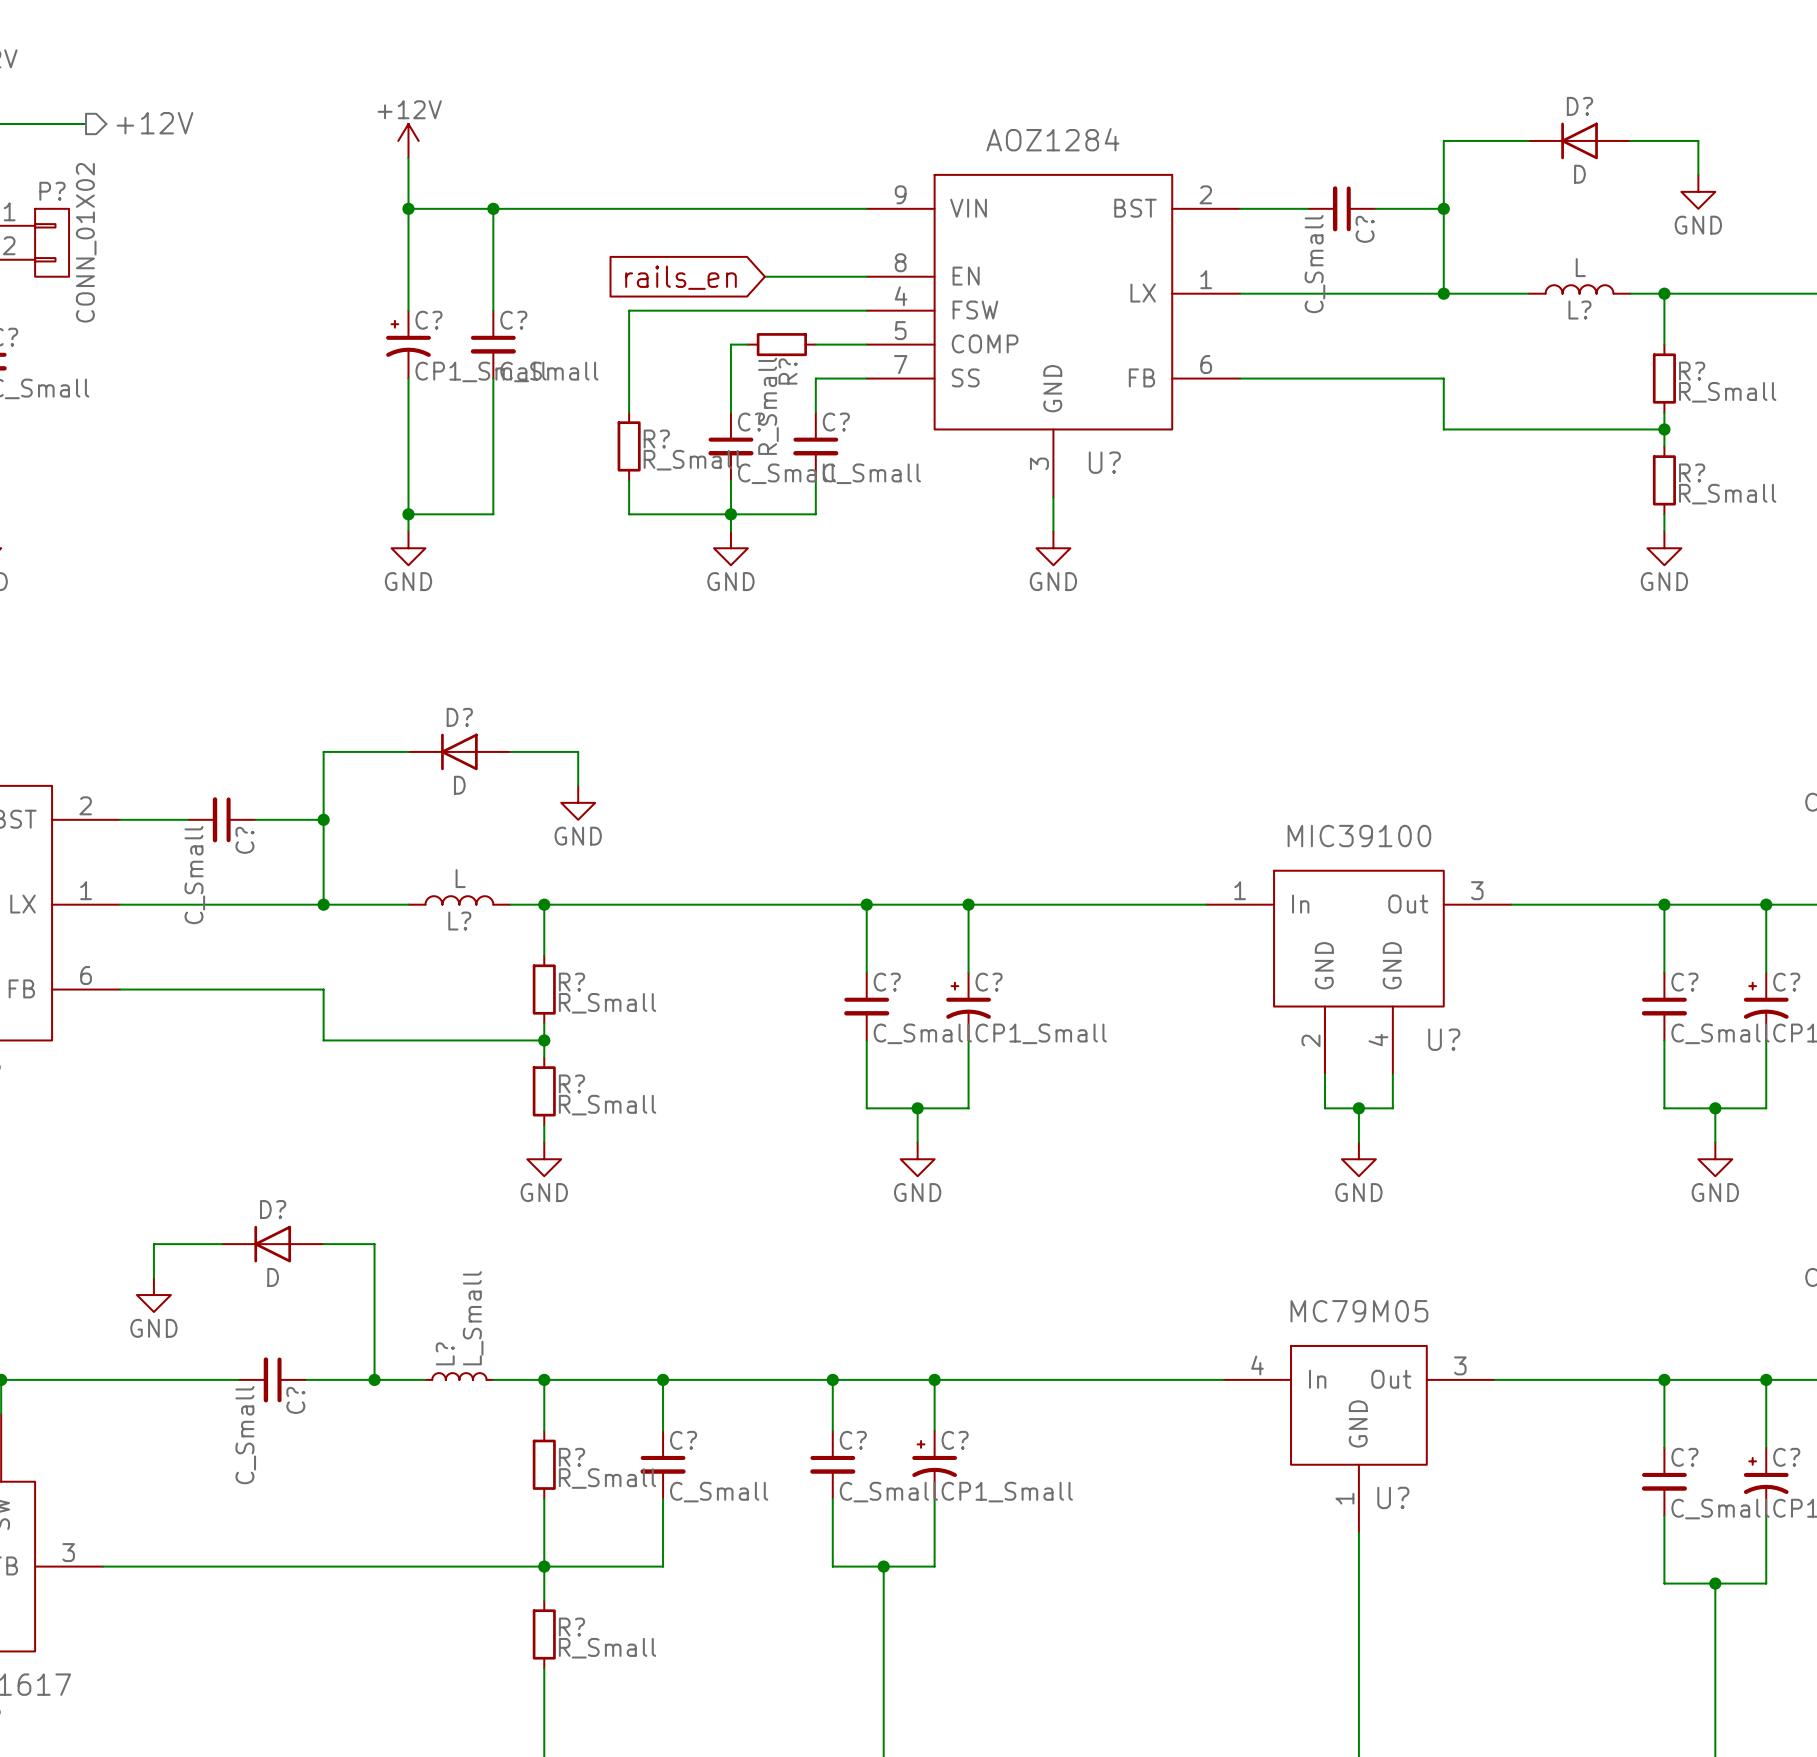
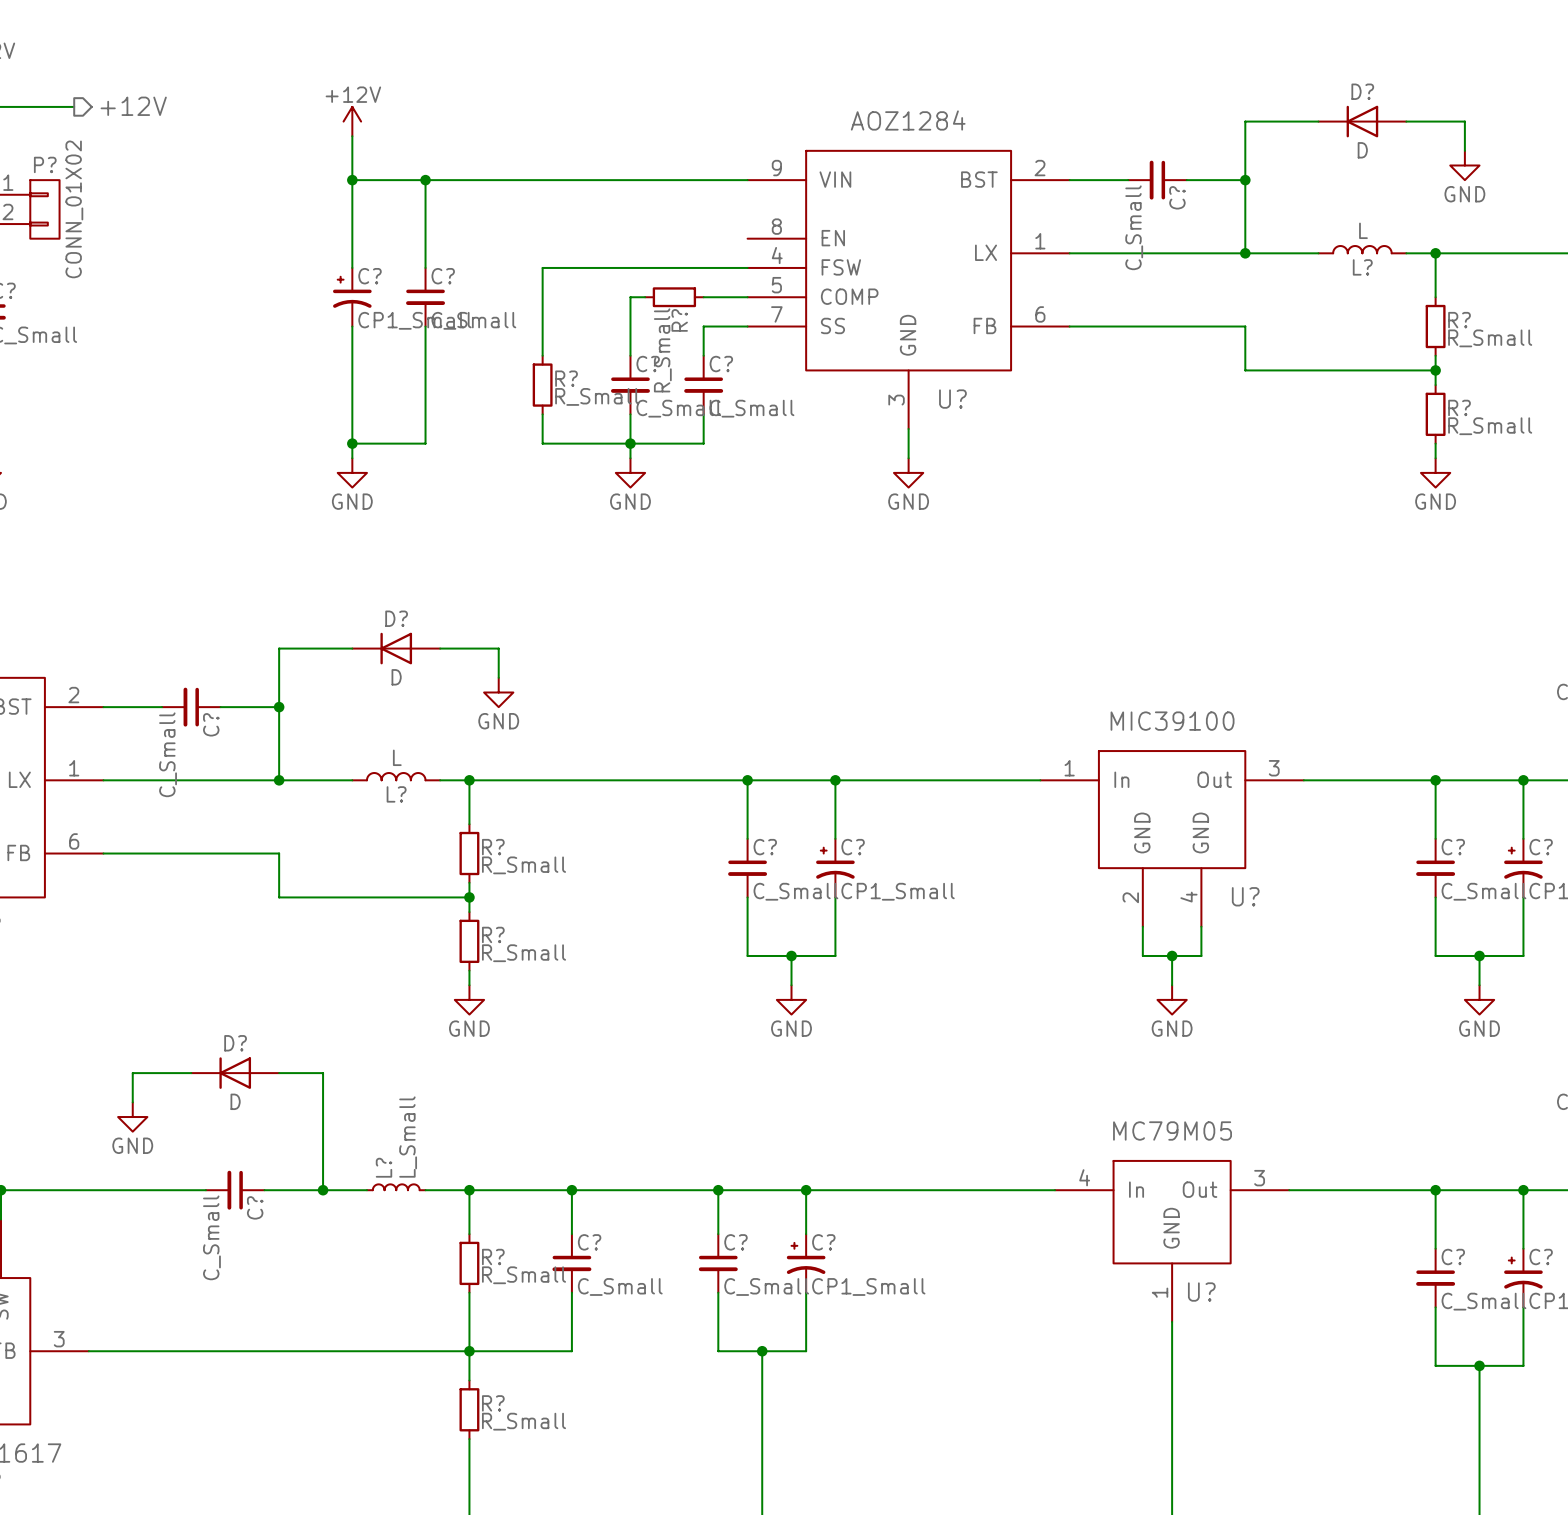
wire: (764, 276) (866, 276) -> none
global label: rails_en (681, 277) -> none

